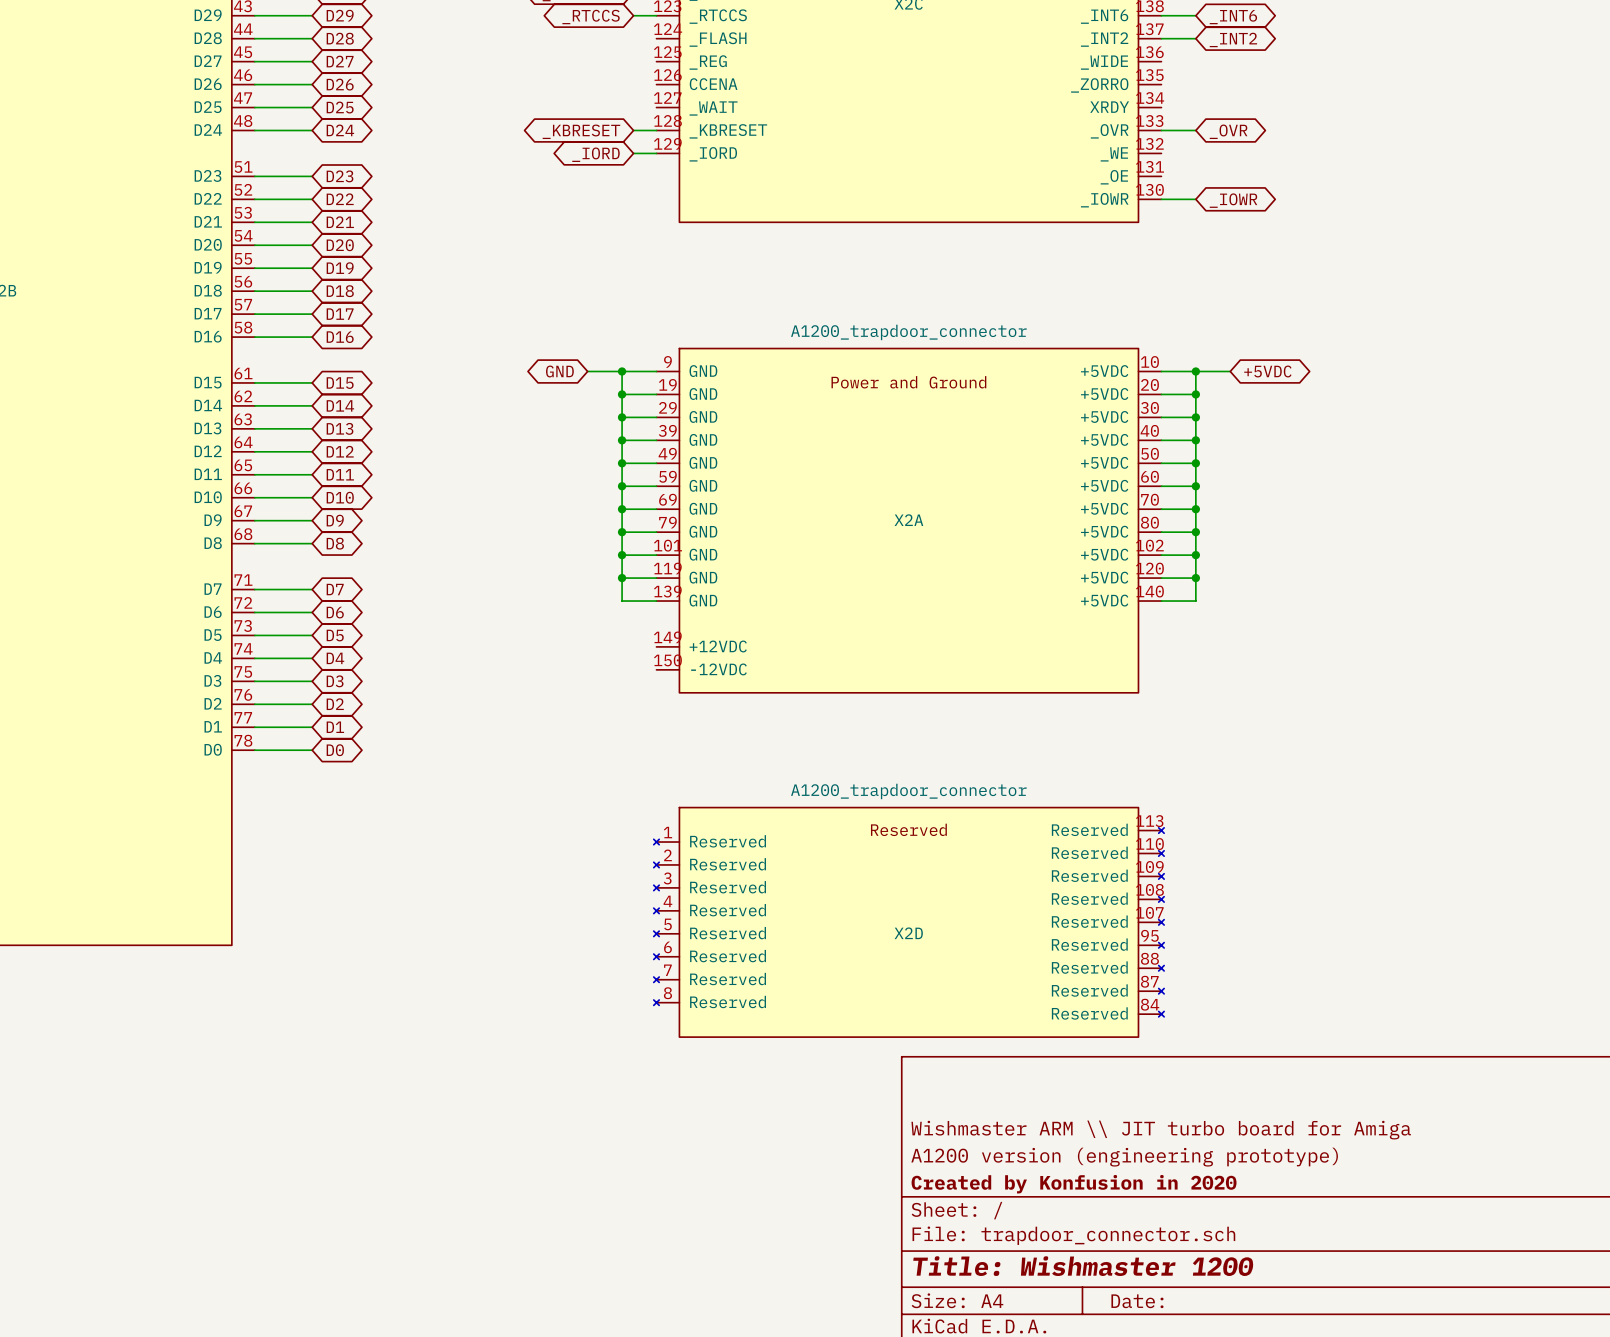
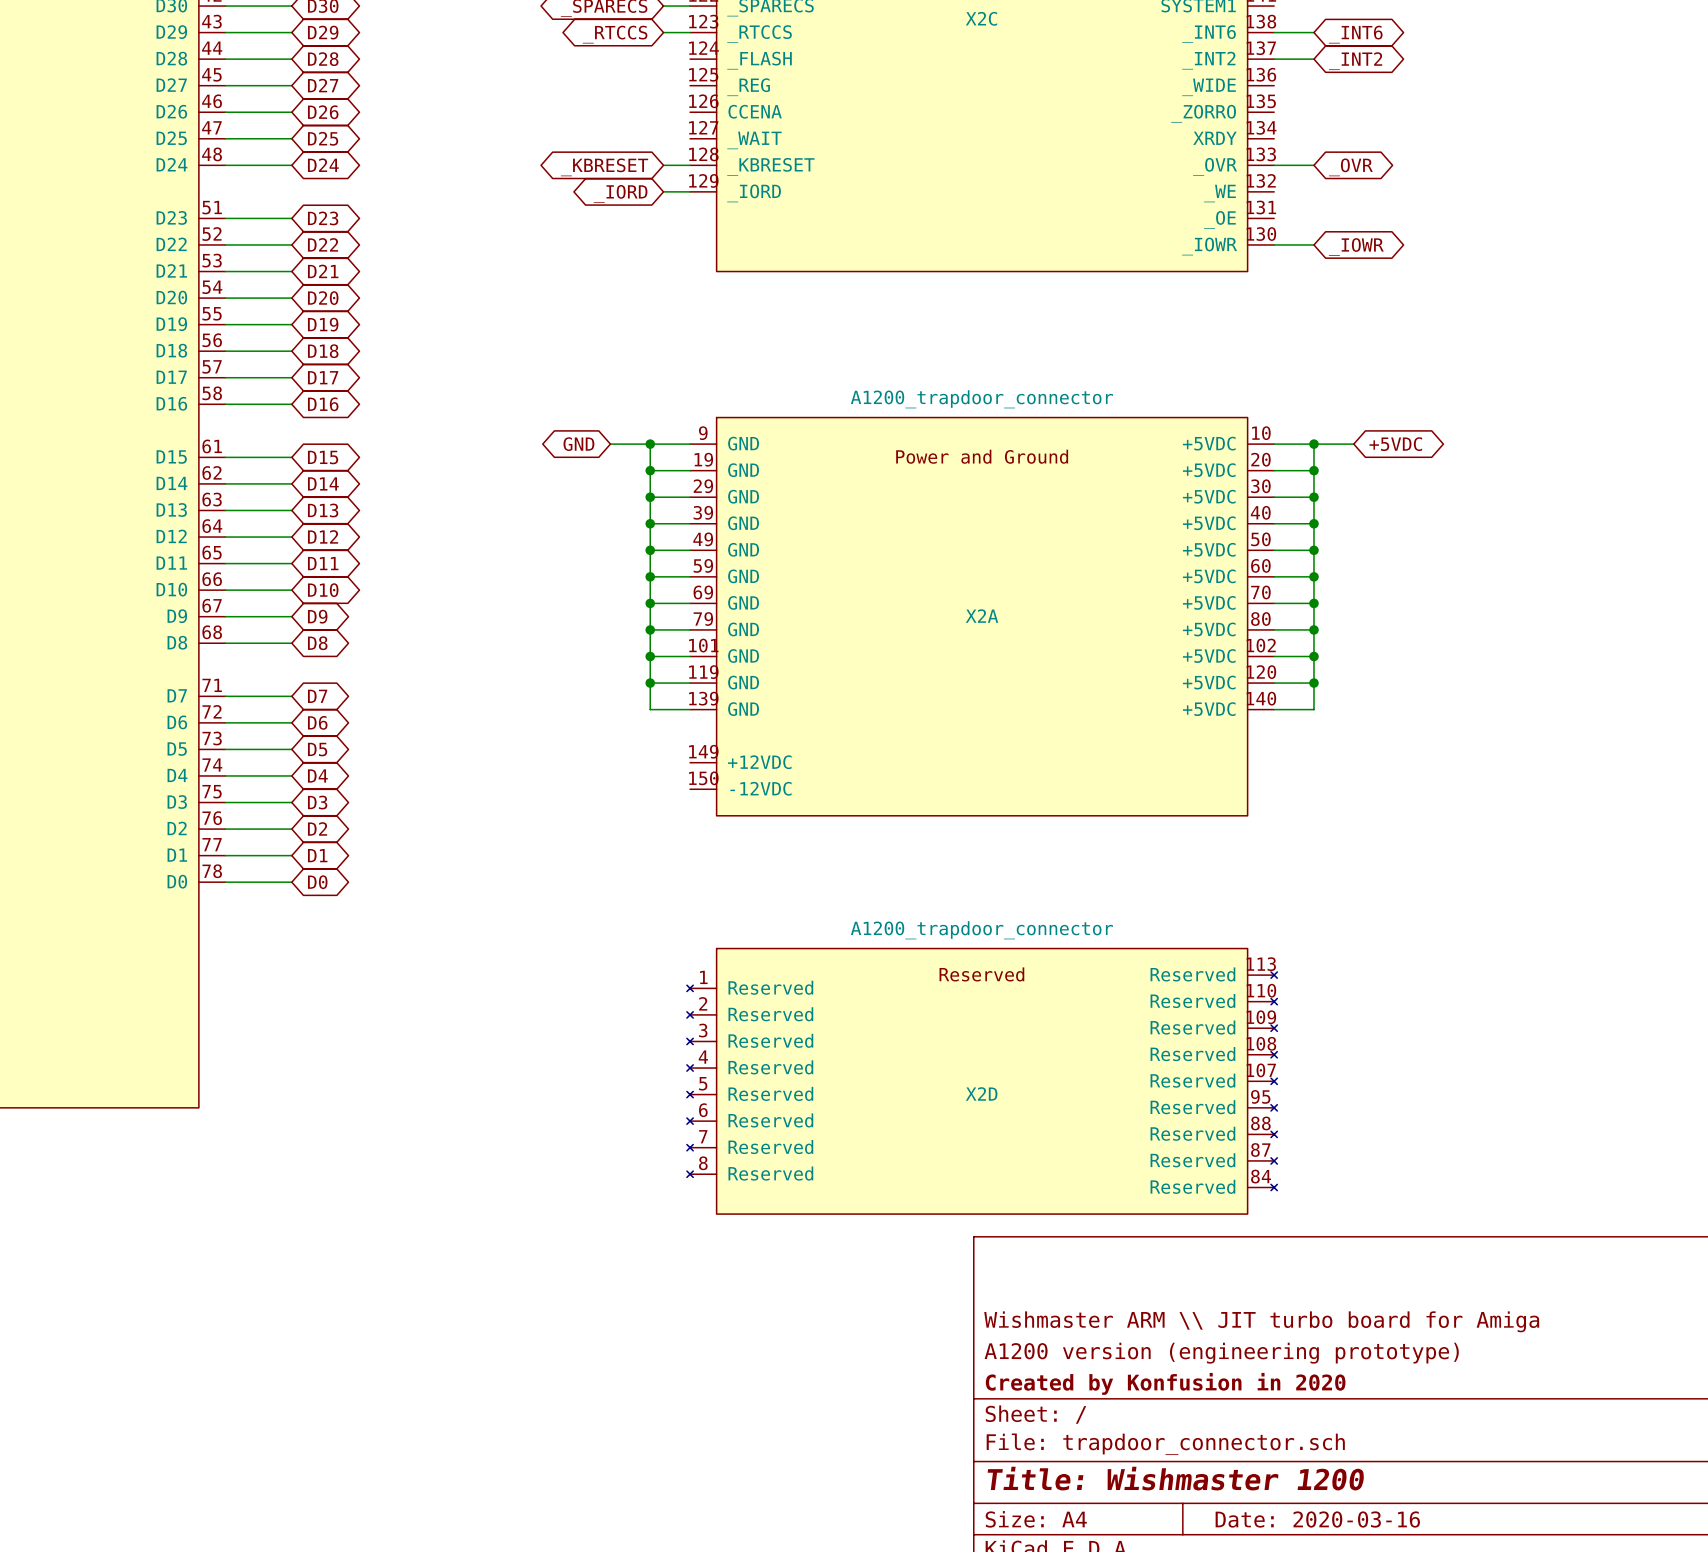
title block: Date: (1137, 1301) -> Date: 2020-03-16 (1317, 1519)

